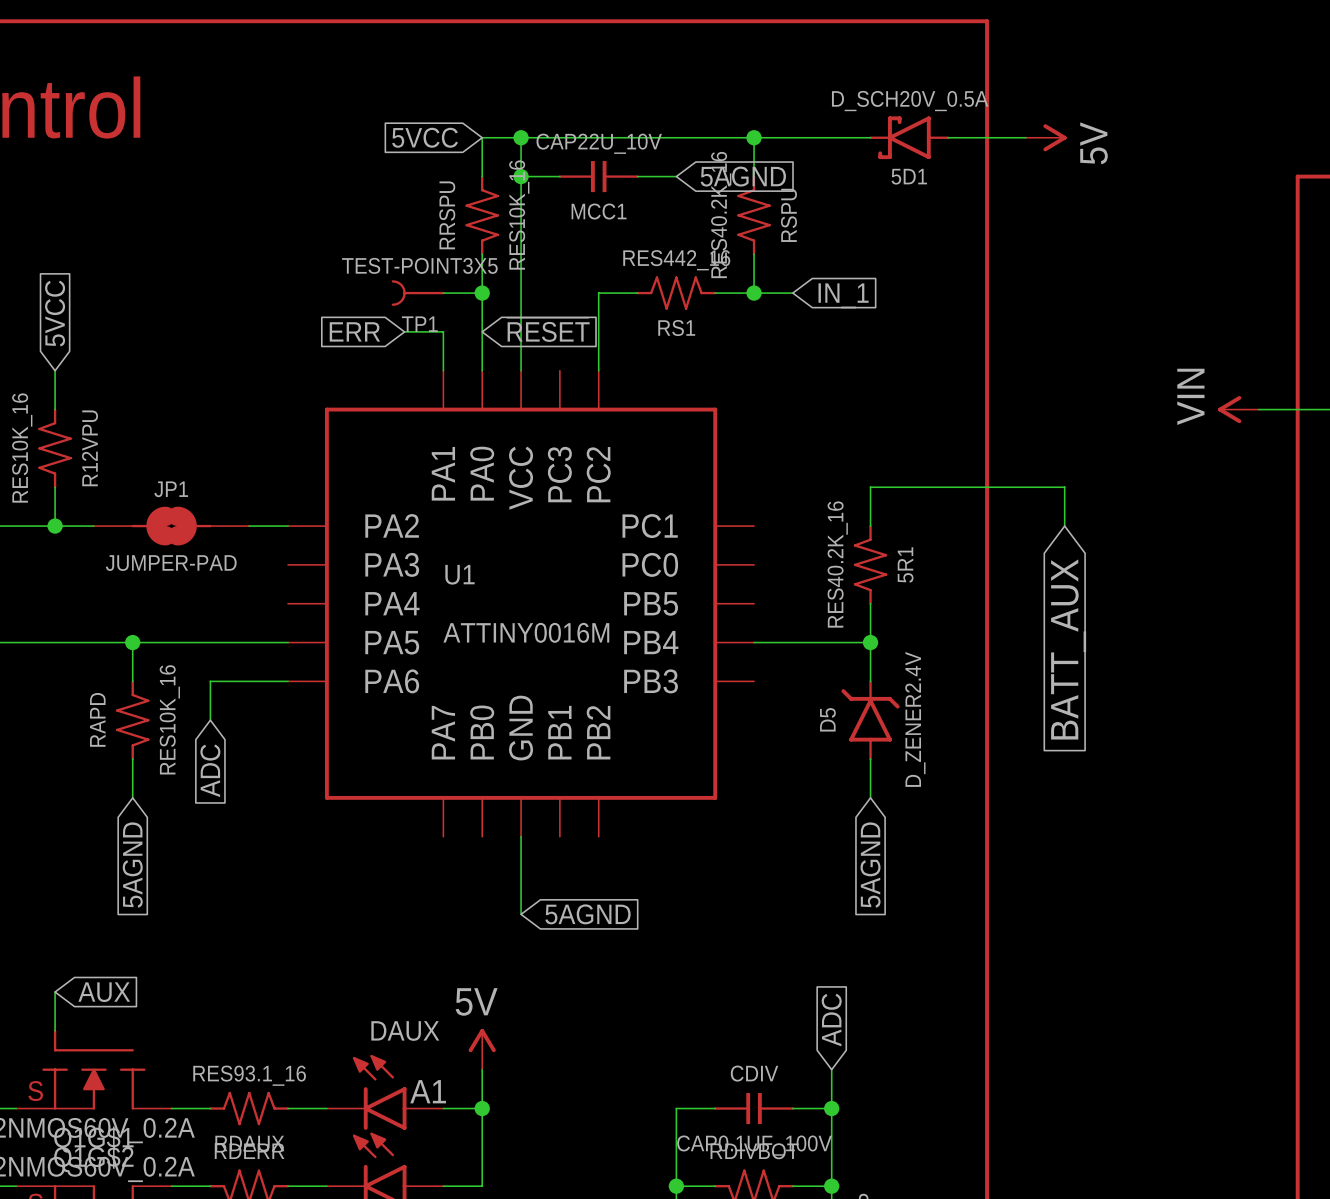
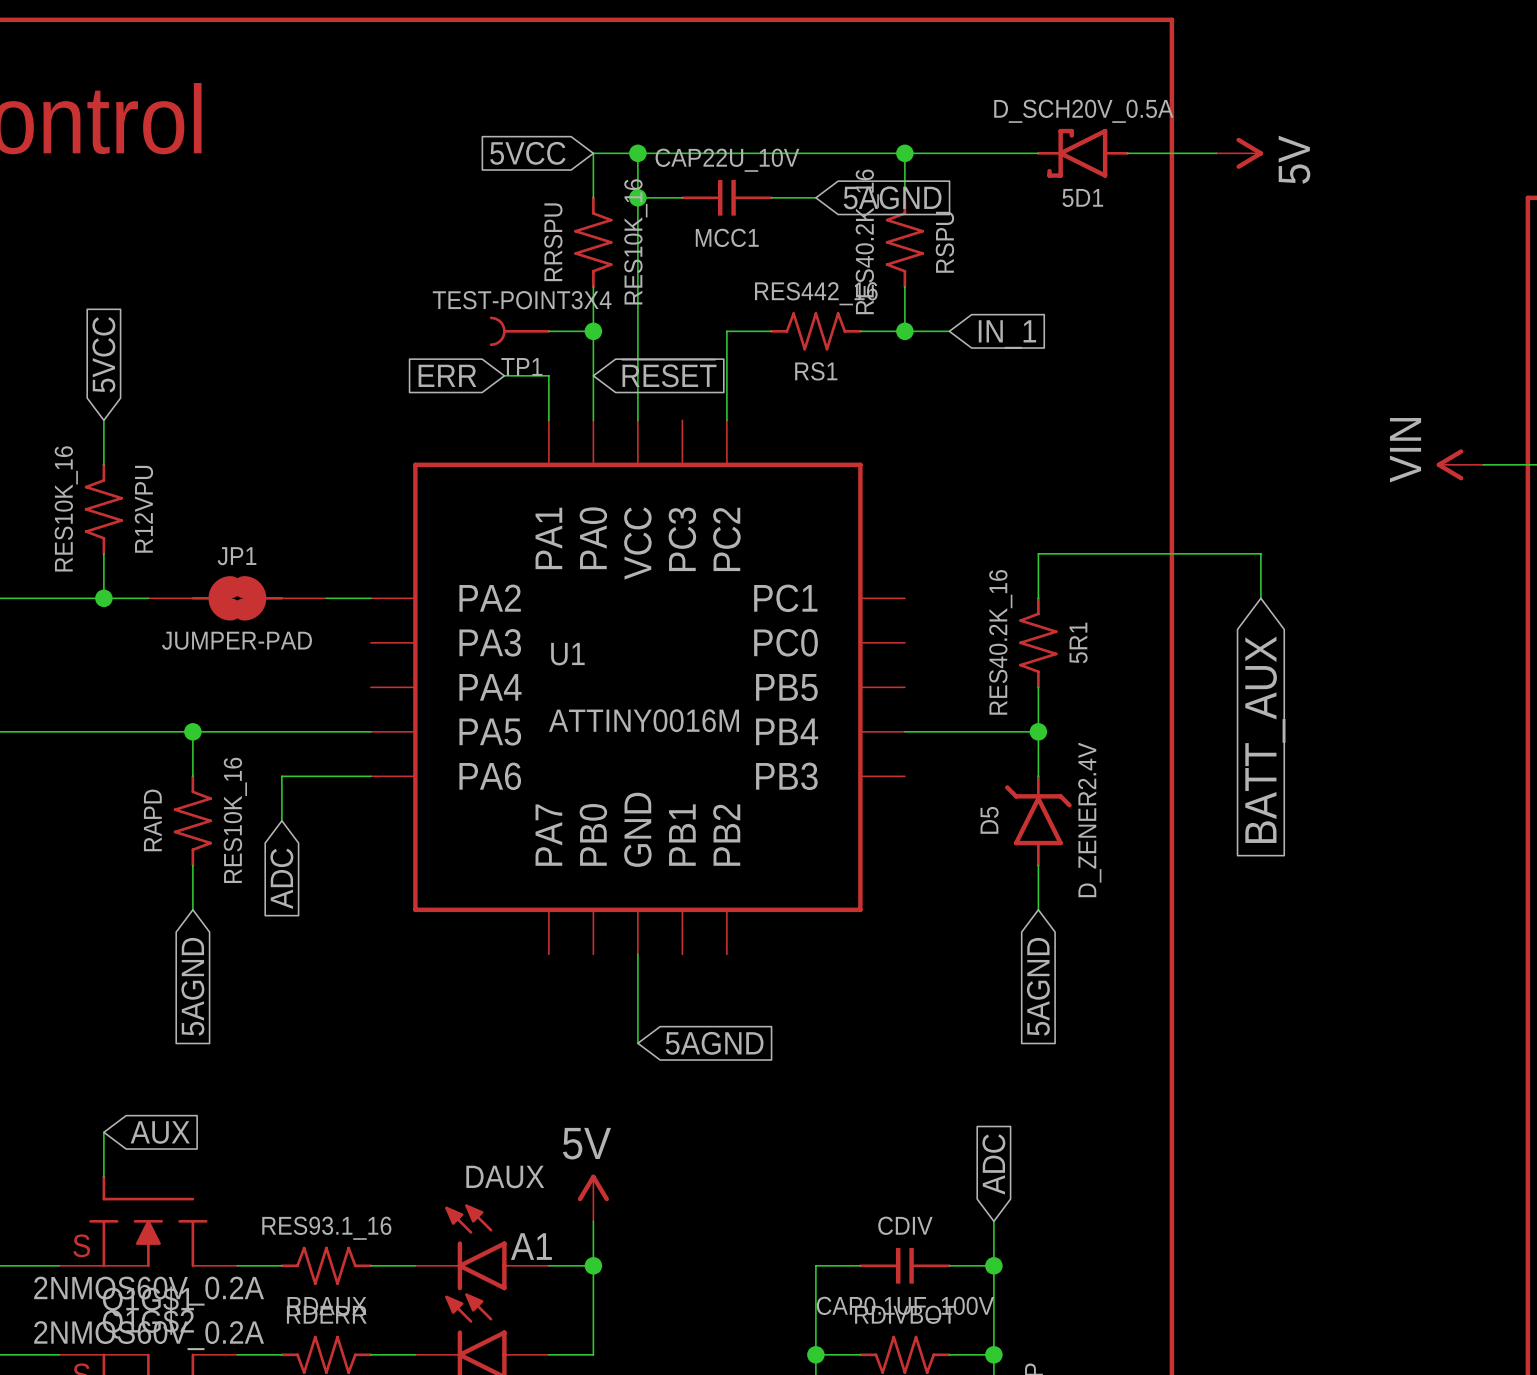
TP1 value: TEST-POINT3X5 (419, 265) -> TEST-POINT3X4 (522, 300)

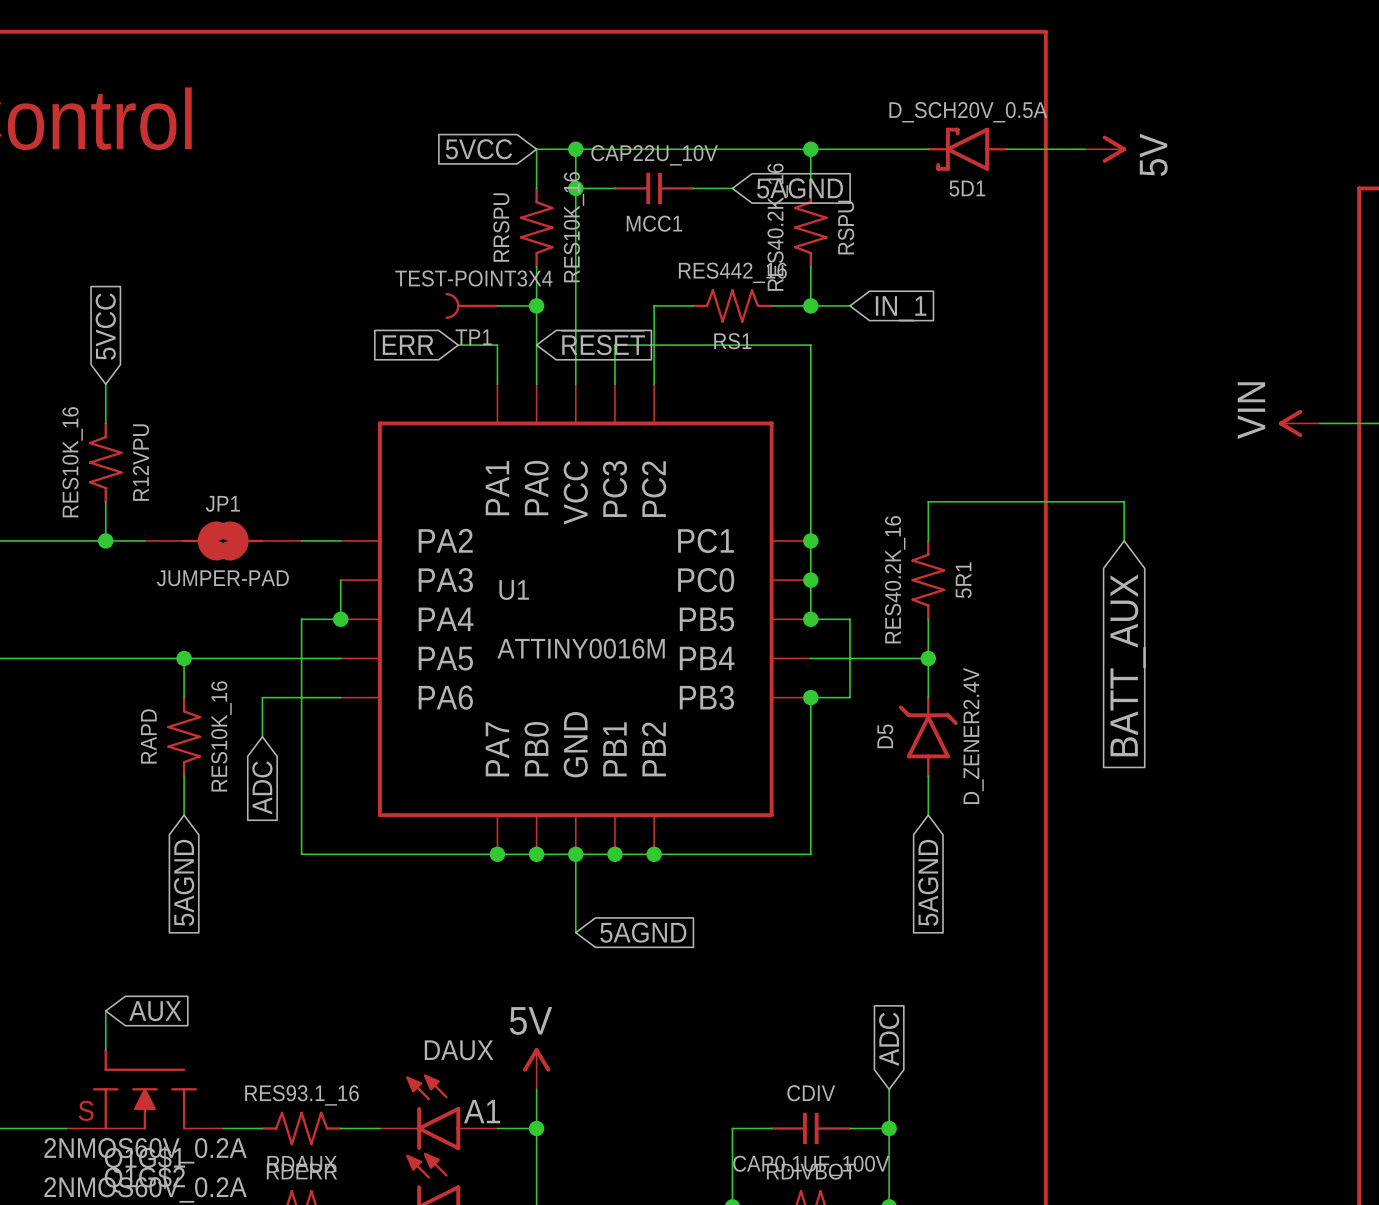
wire: none -> (614, 384) (614, 345) (810, 345) (810, 619) (849, 619) (849, 697) (810, 697) (810, 854) (301, 854) (301, 619) (340, 619) (340, 580)
junction: none -> (810, 540)
junction: none -> (810, 580)
junction: none -> (340, 619)
junction: none -> (810, 619)
junction: none -> (810, 697)
junction: none -> (497, 854)
junction: none -> (536, 854)
junction: none -> (575, 854)
junction: none -> (614, 854)
junction: none -> (654, 854)

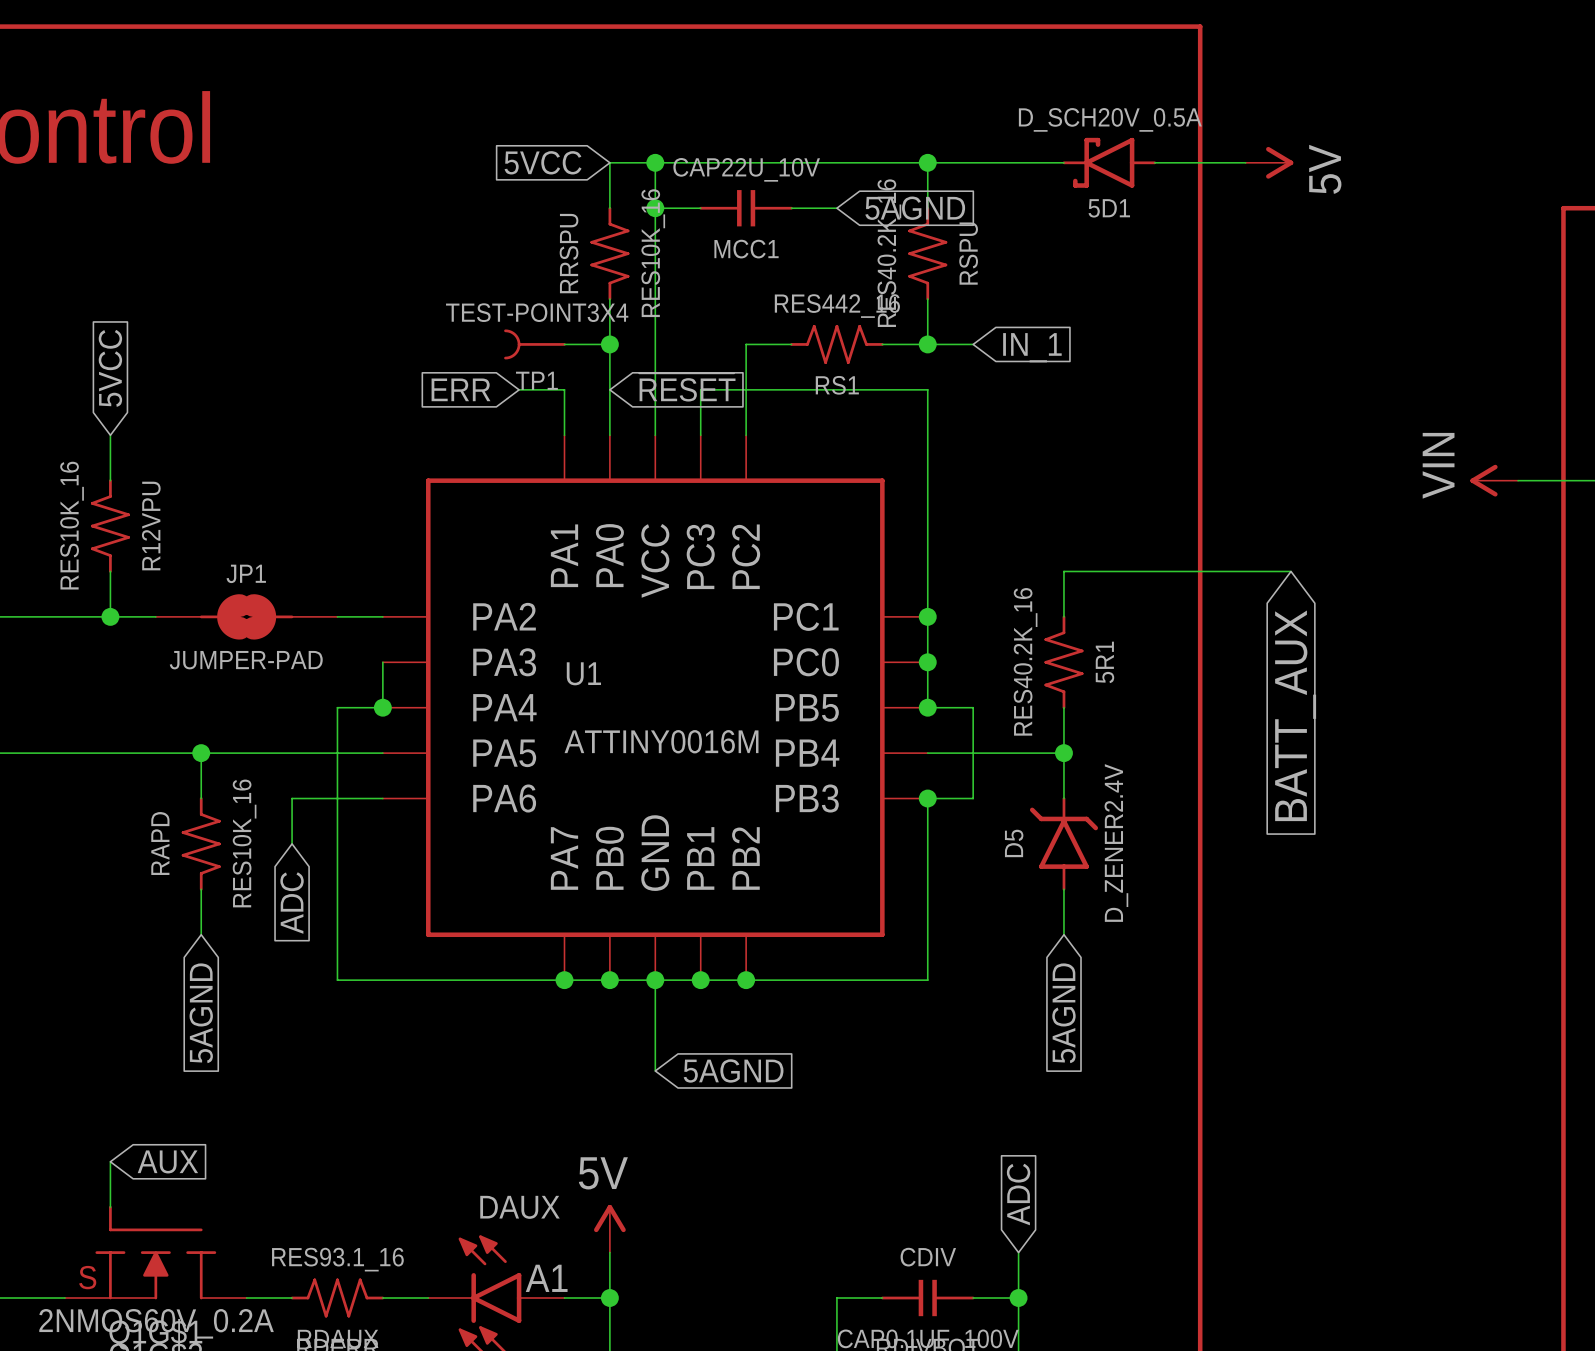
wire: (1124, 501) (1124, 540) -> none
global label position: BATT_AUX (1128, 665) -> BATT_AUX (1295, 715)

